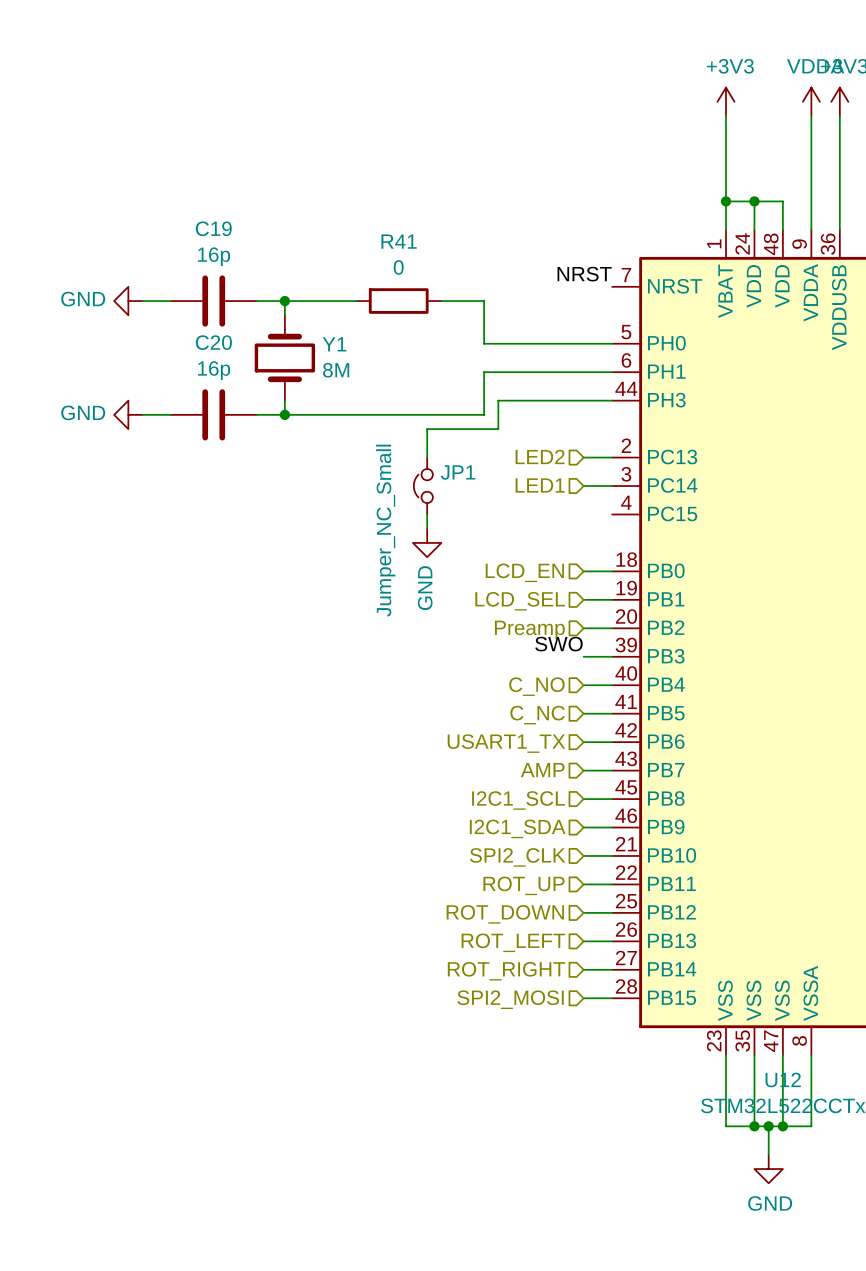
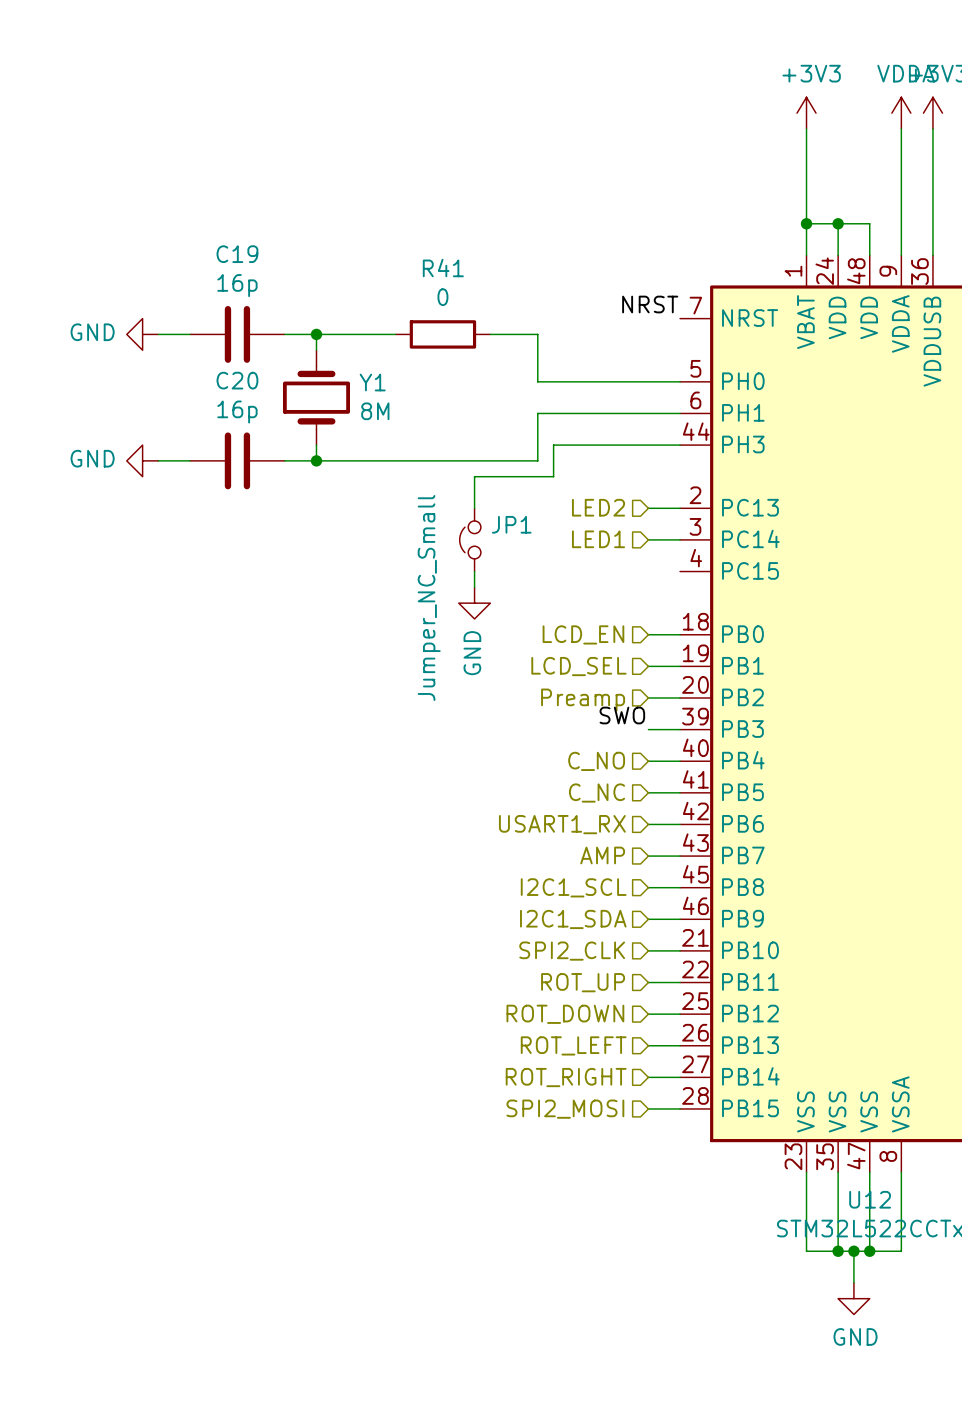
hierarchical label: USART1_TX (506, 743) -> USART1_RX (562, 824)

